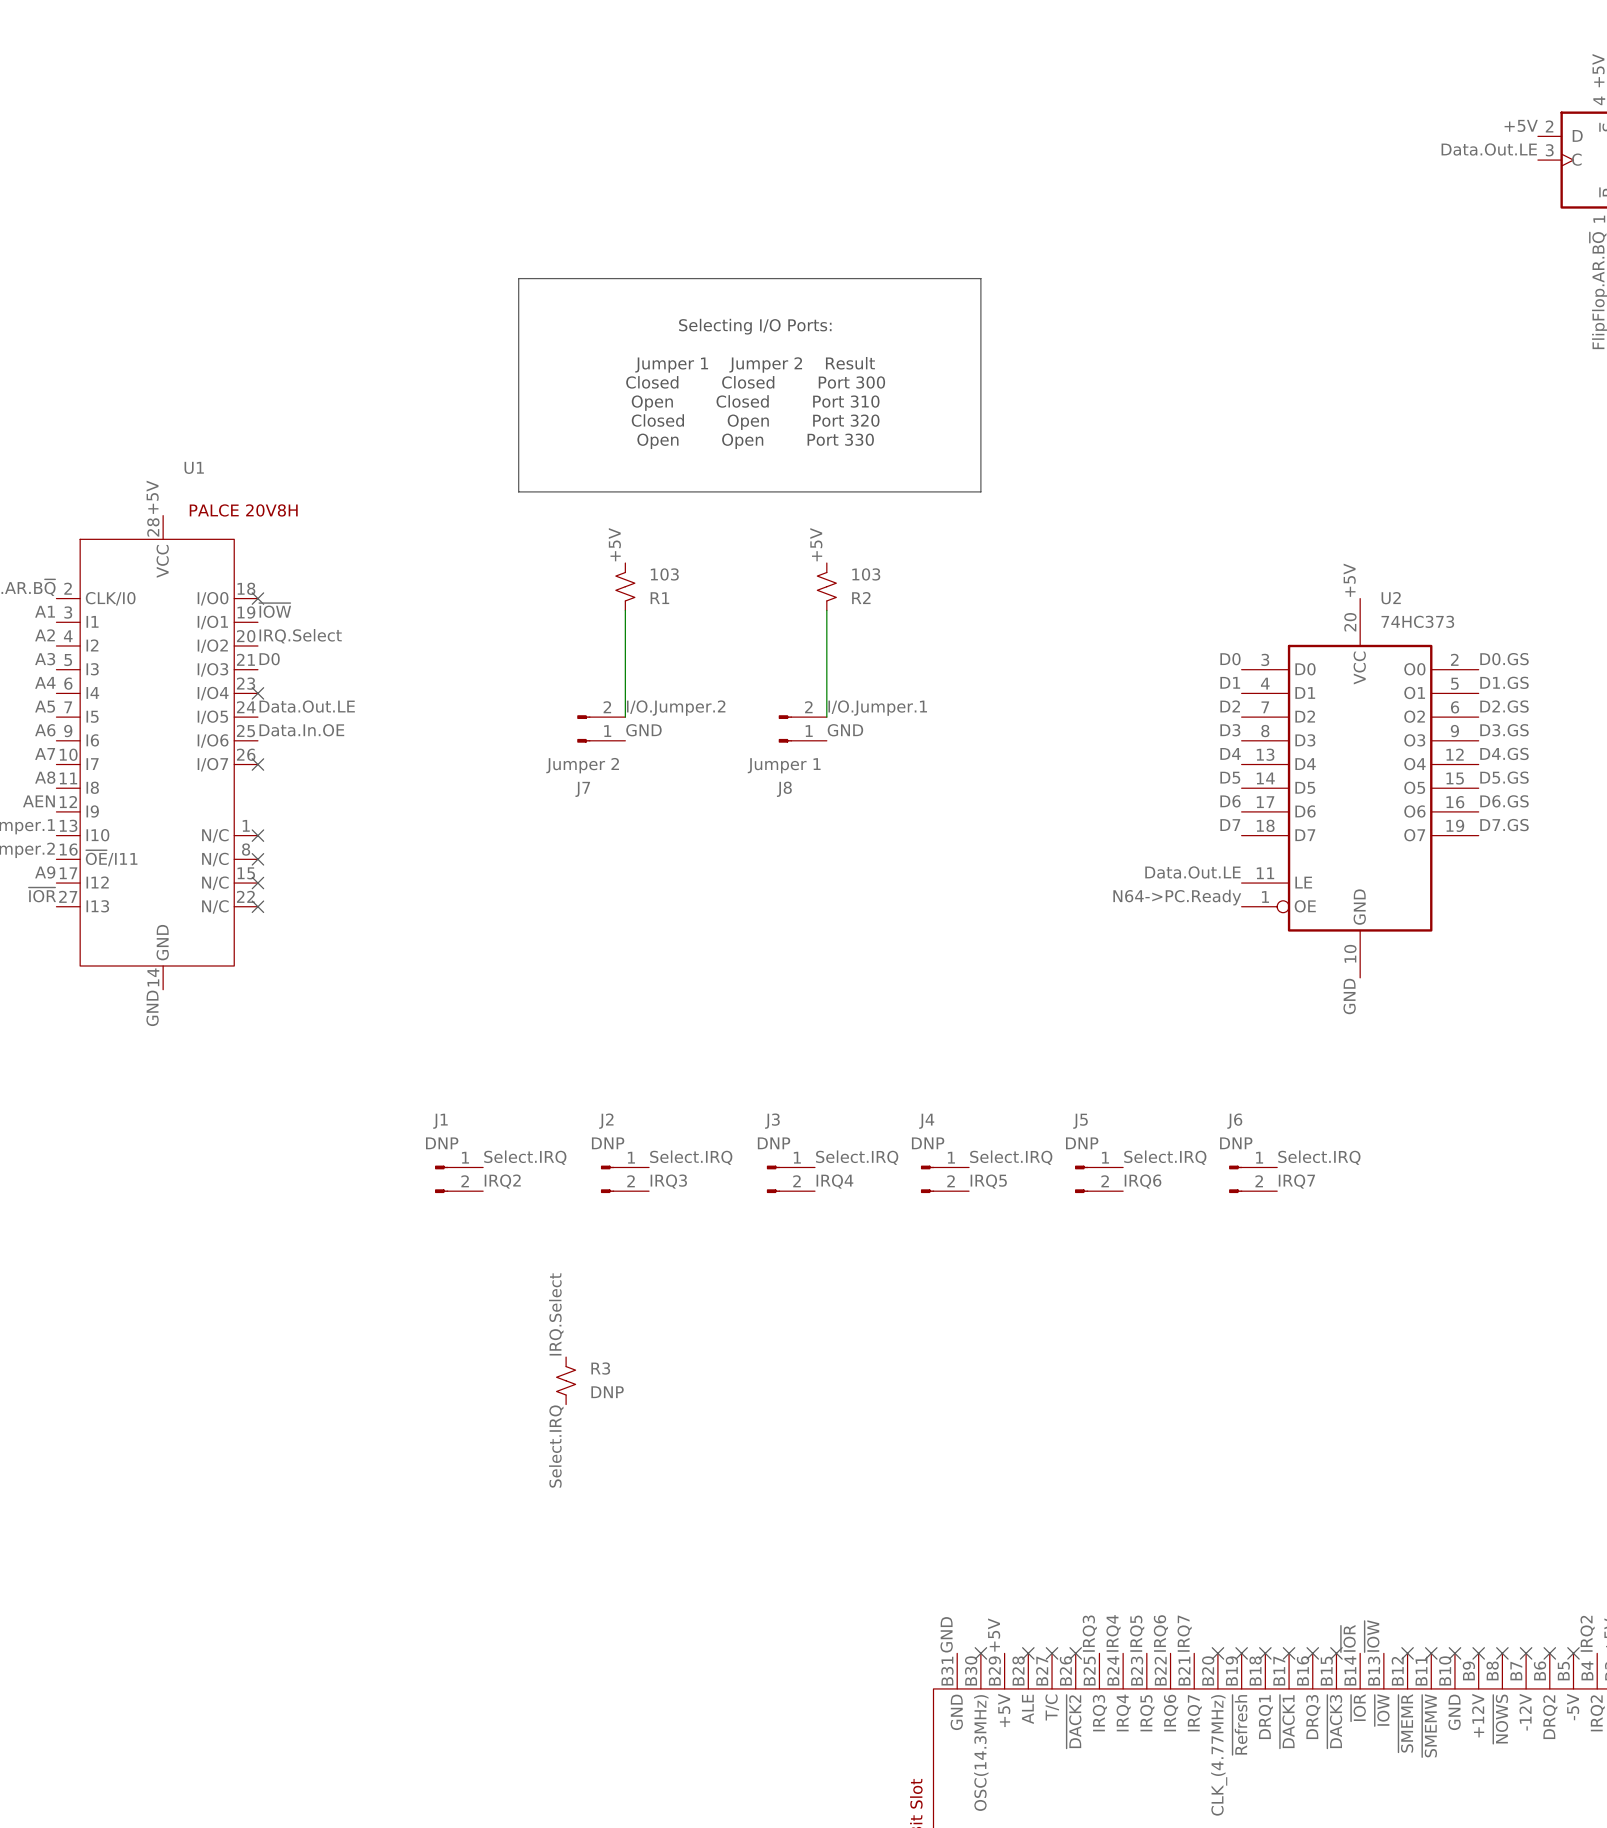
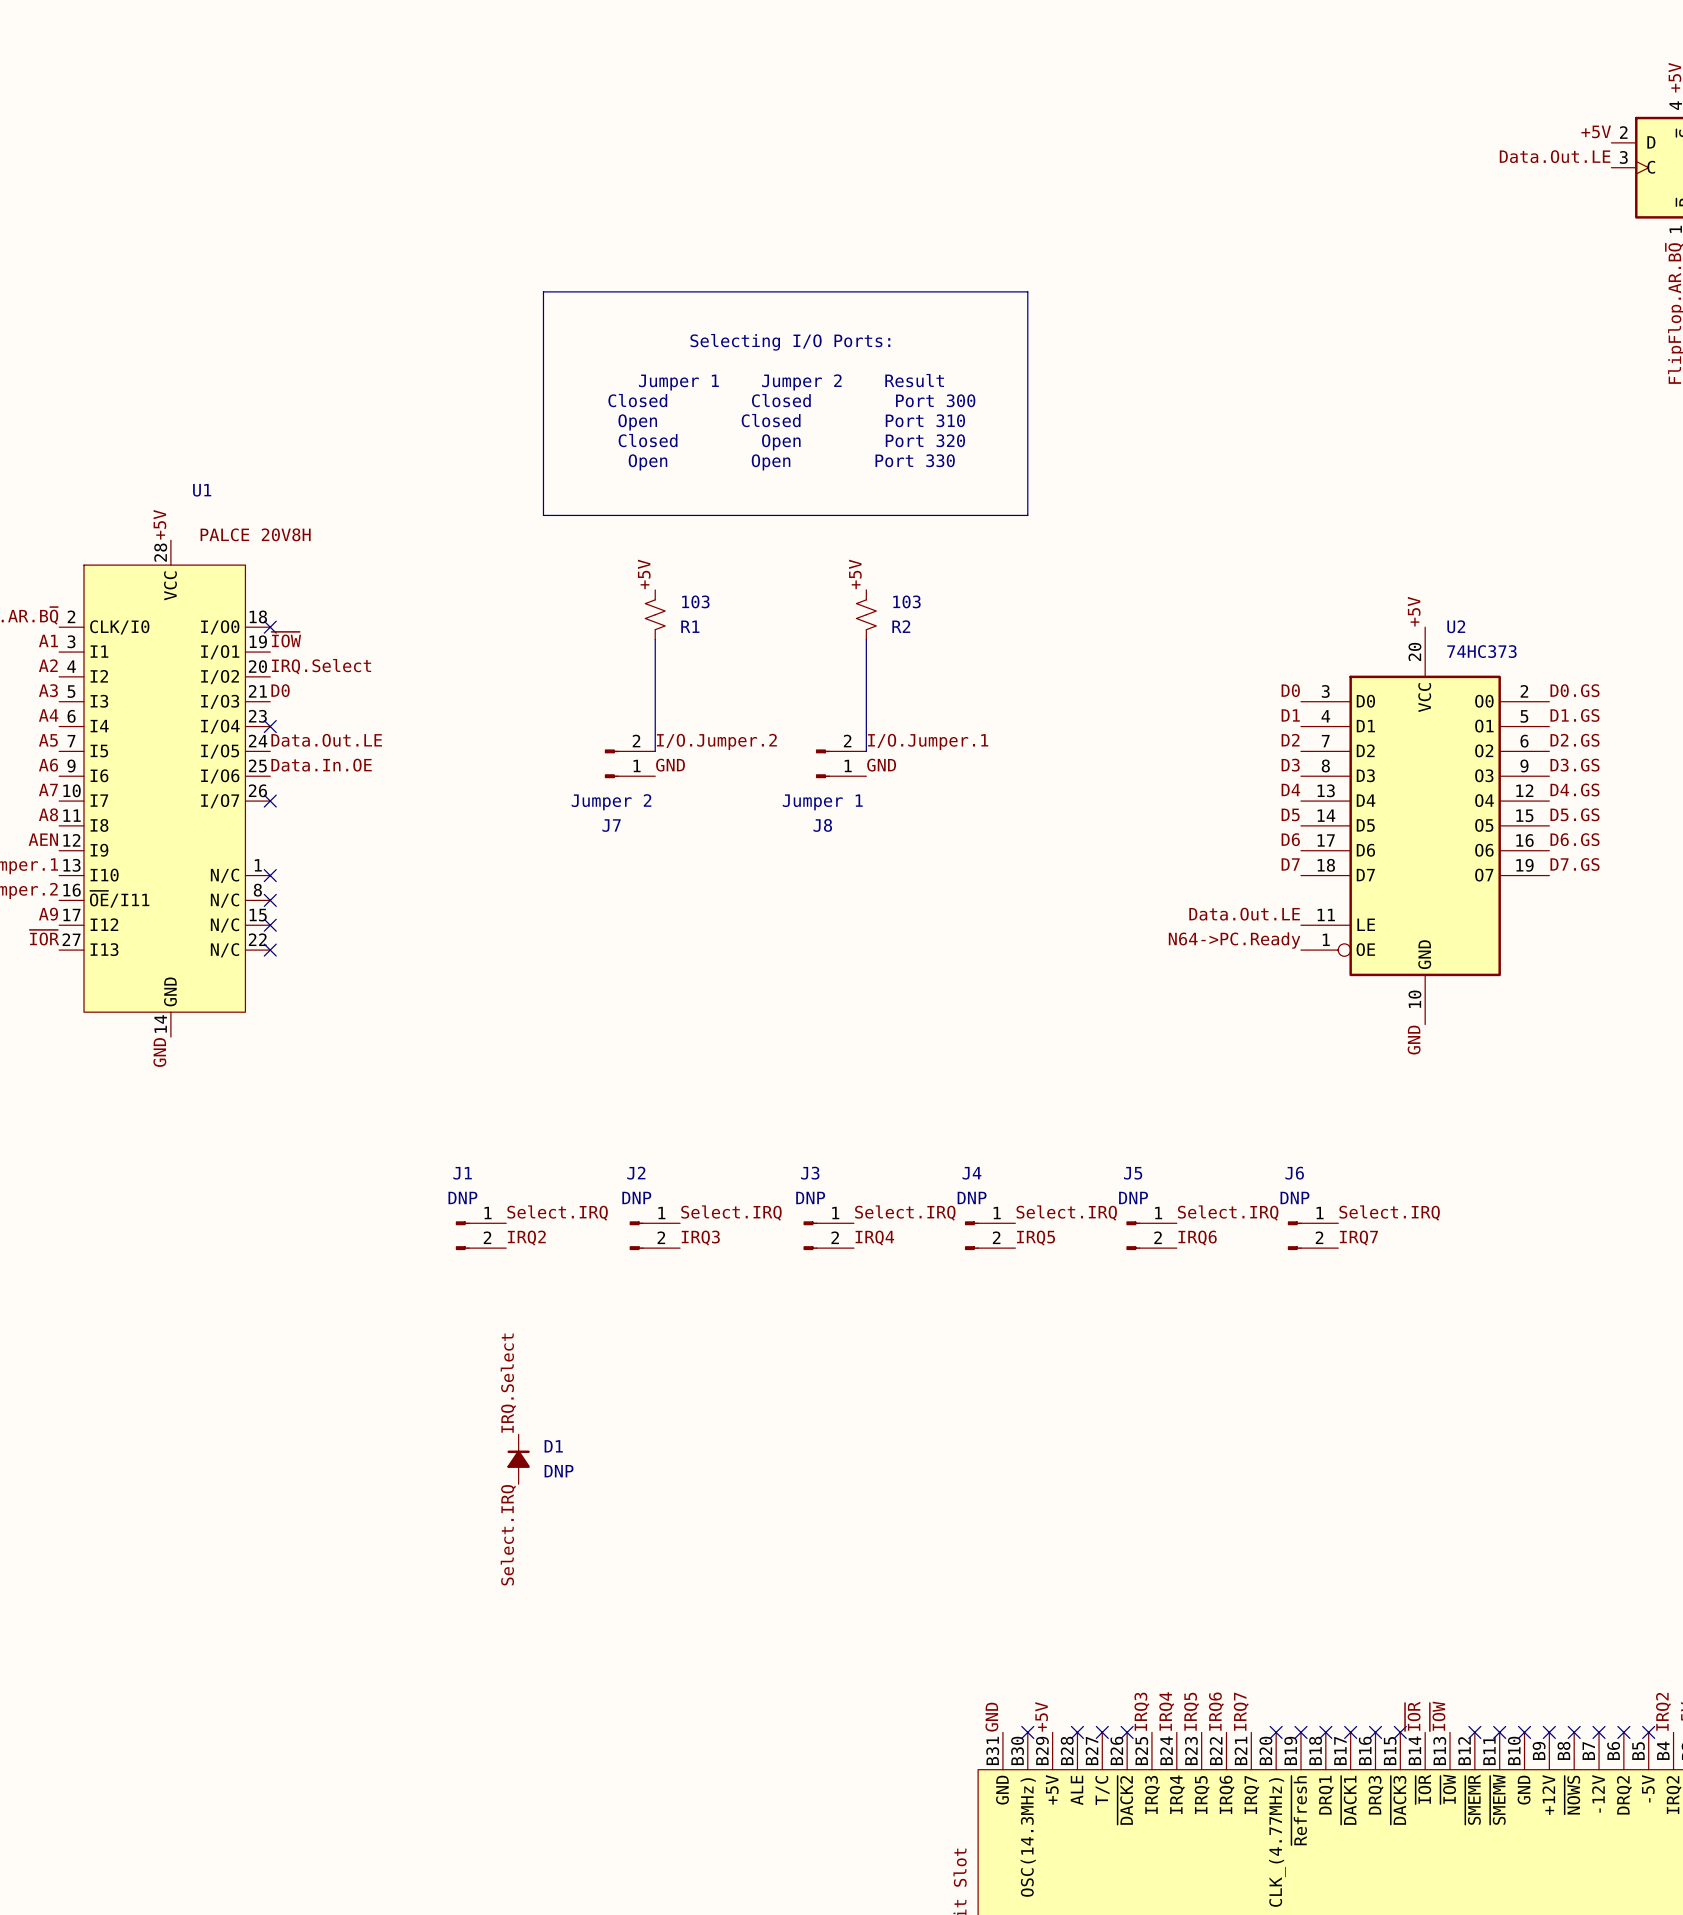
label position: IRQ.Select (556, 1314) -> IRQ.Select (508, 1383)
R3: DNP (566, 1380) -> none
D1: none -> DNP (518, 1459)
label position: Select.IRQ (556, 1446) -> Select.IRQ (508, 1535)

